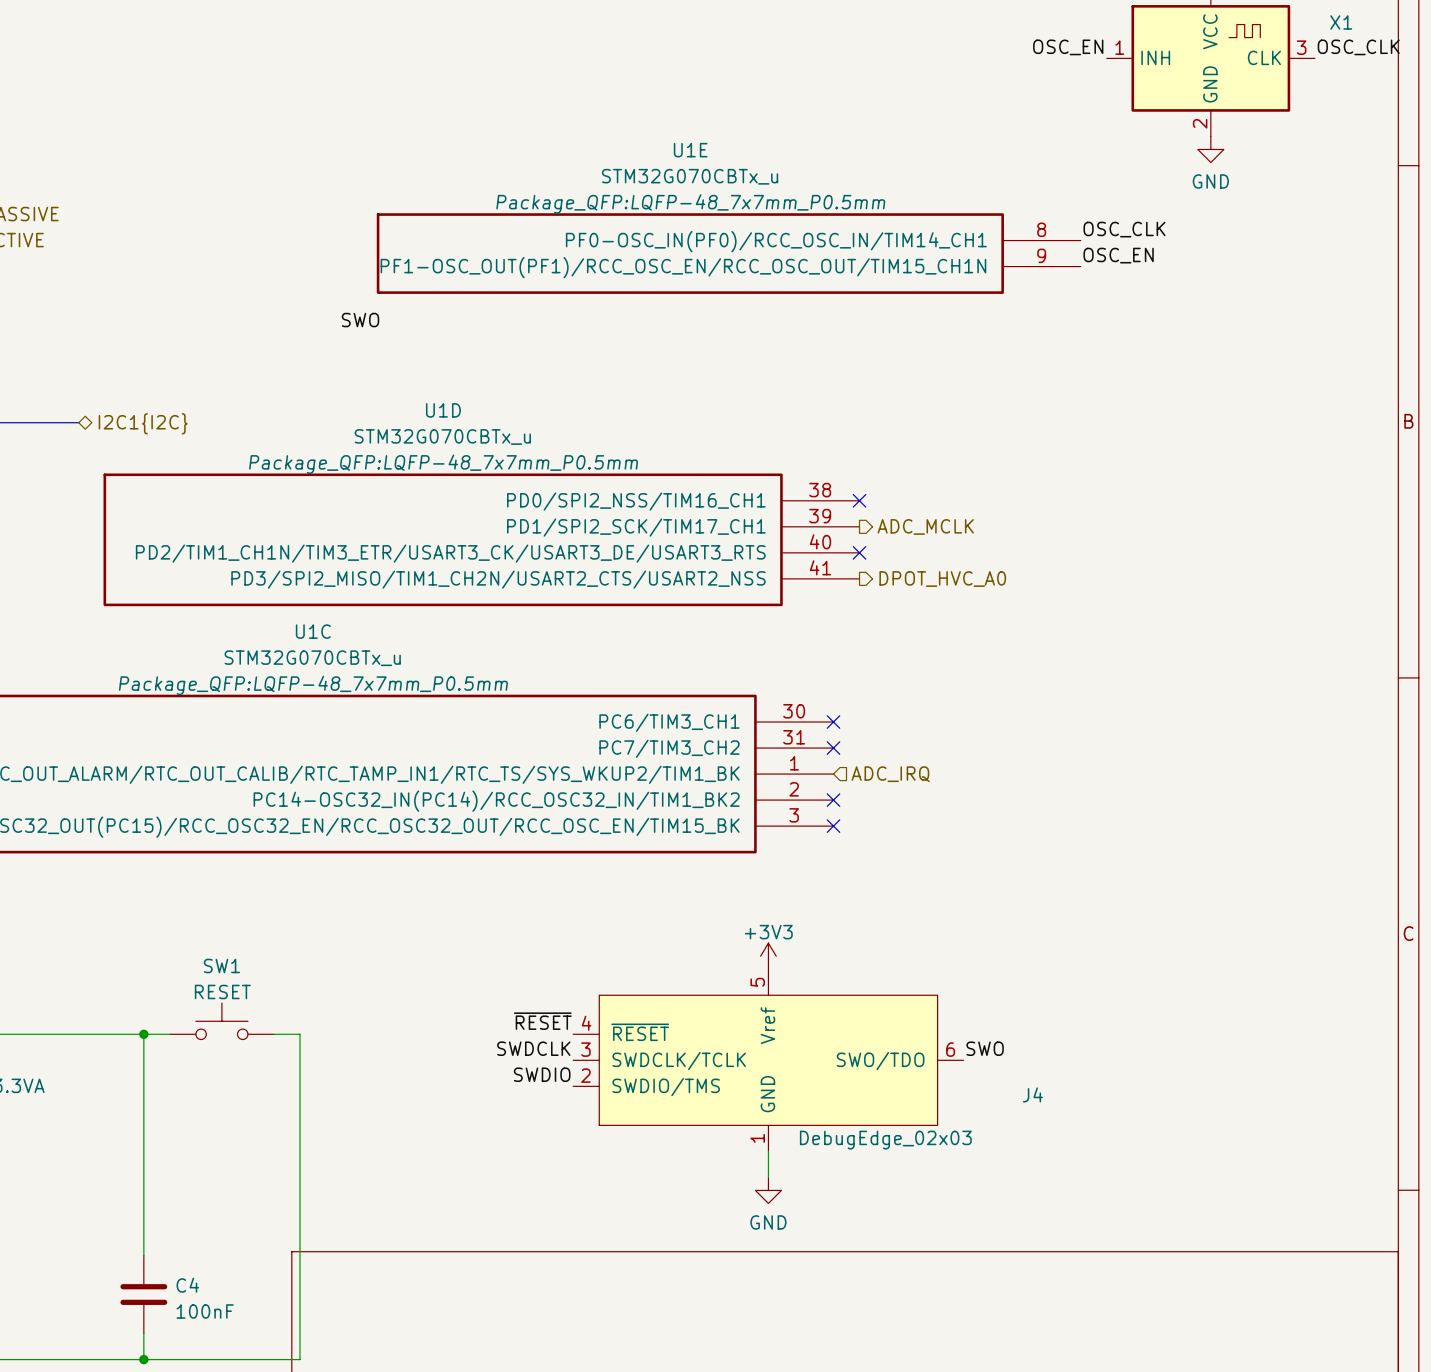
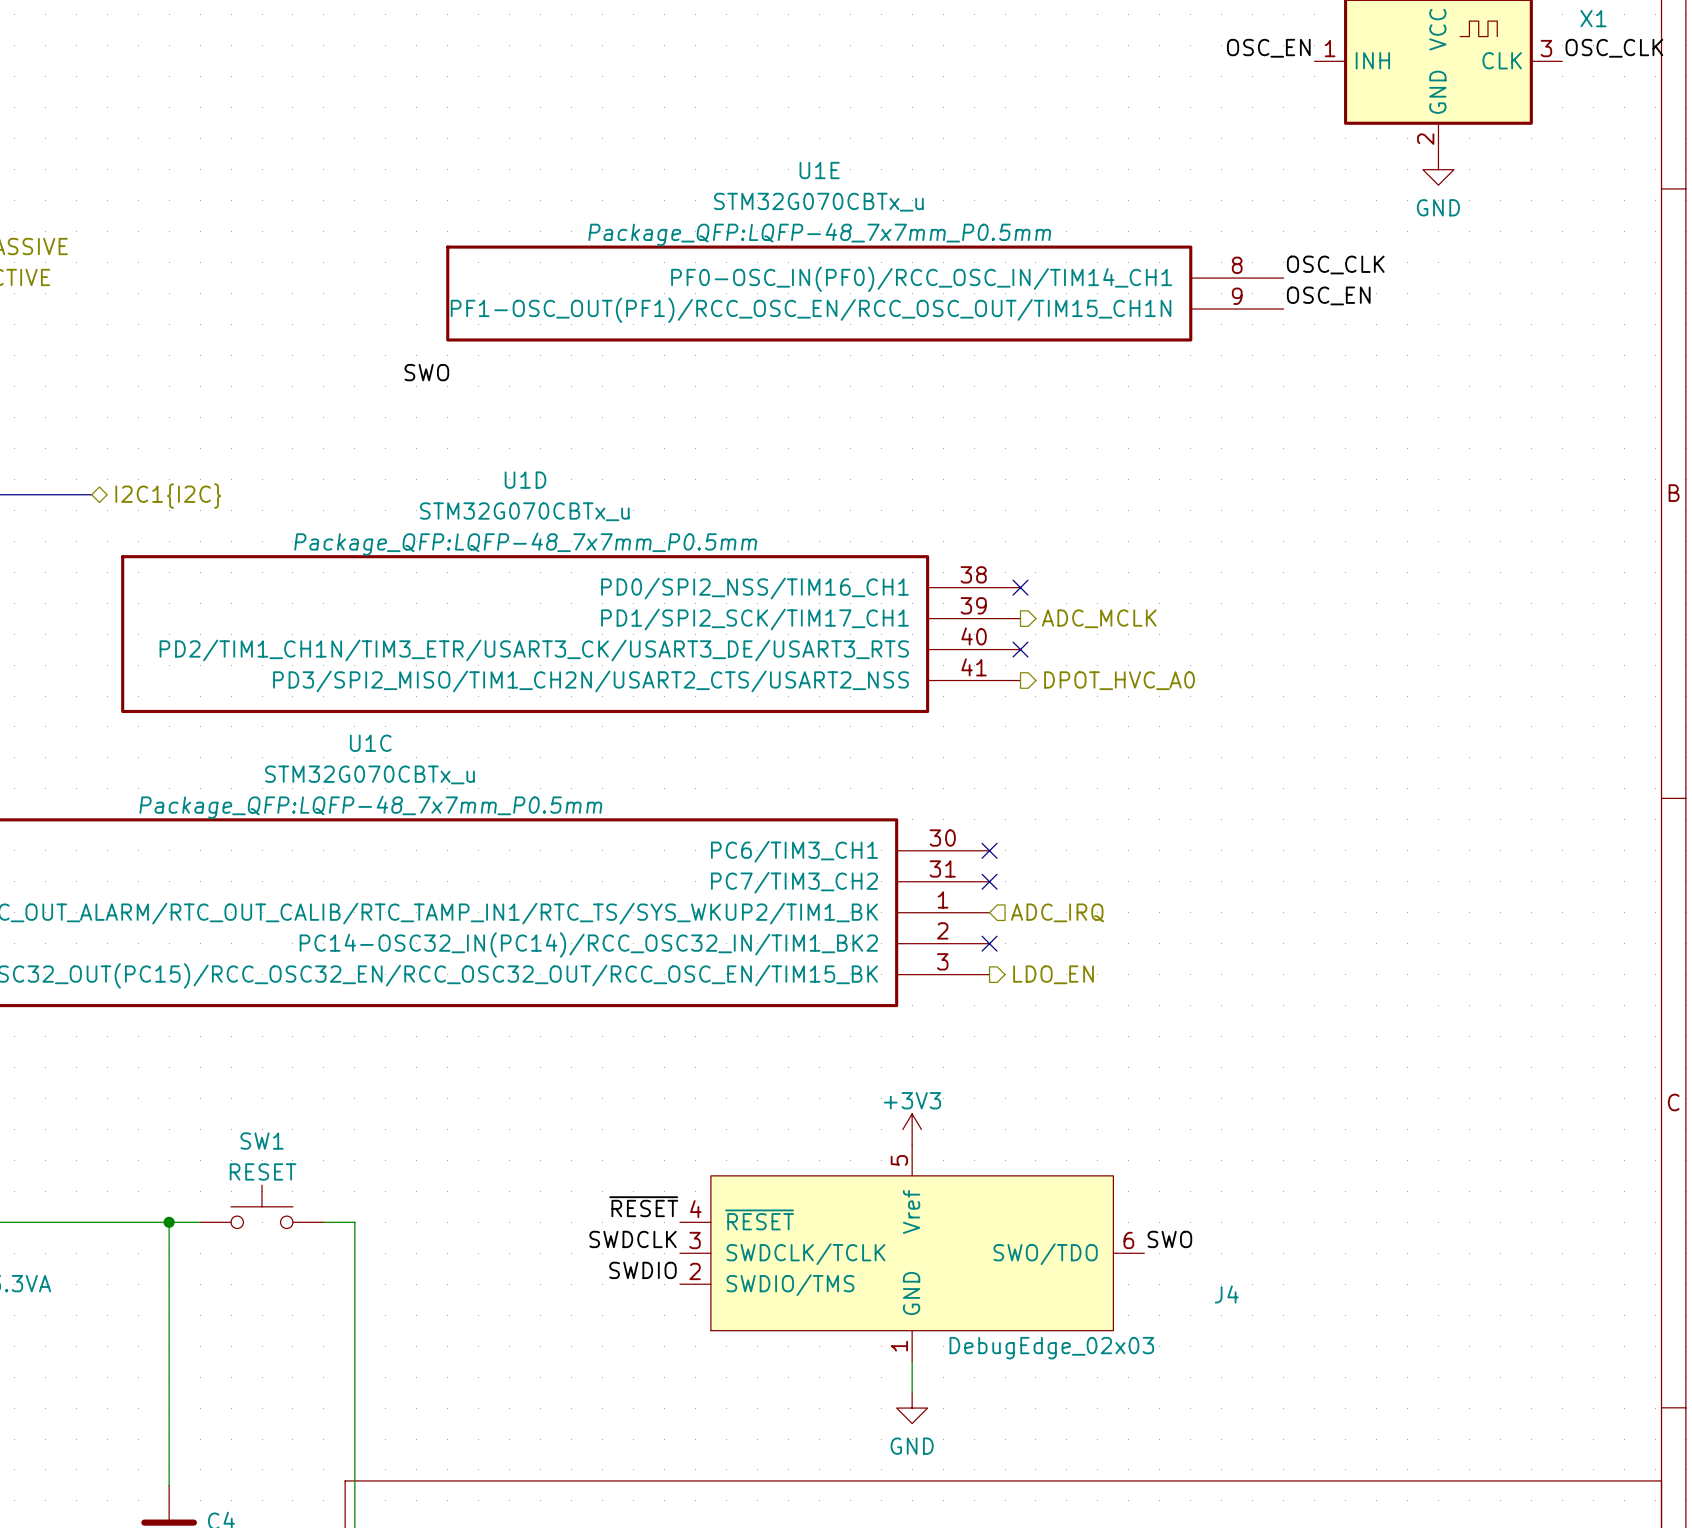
no-connect mark: (833, 826) -> none
hierarchical label: none -> LDO_EN (1053, 974)

